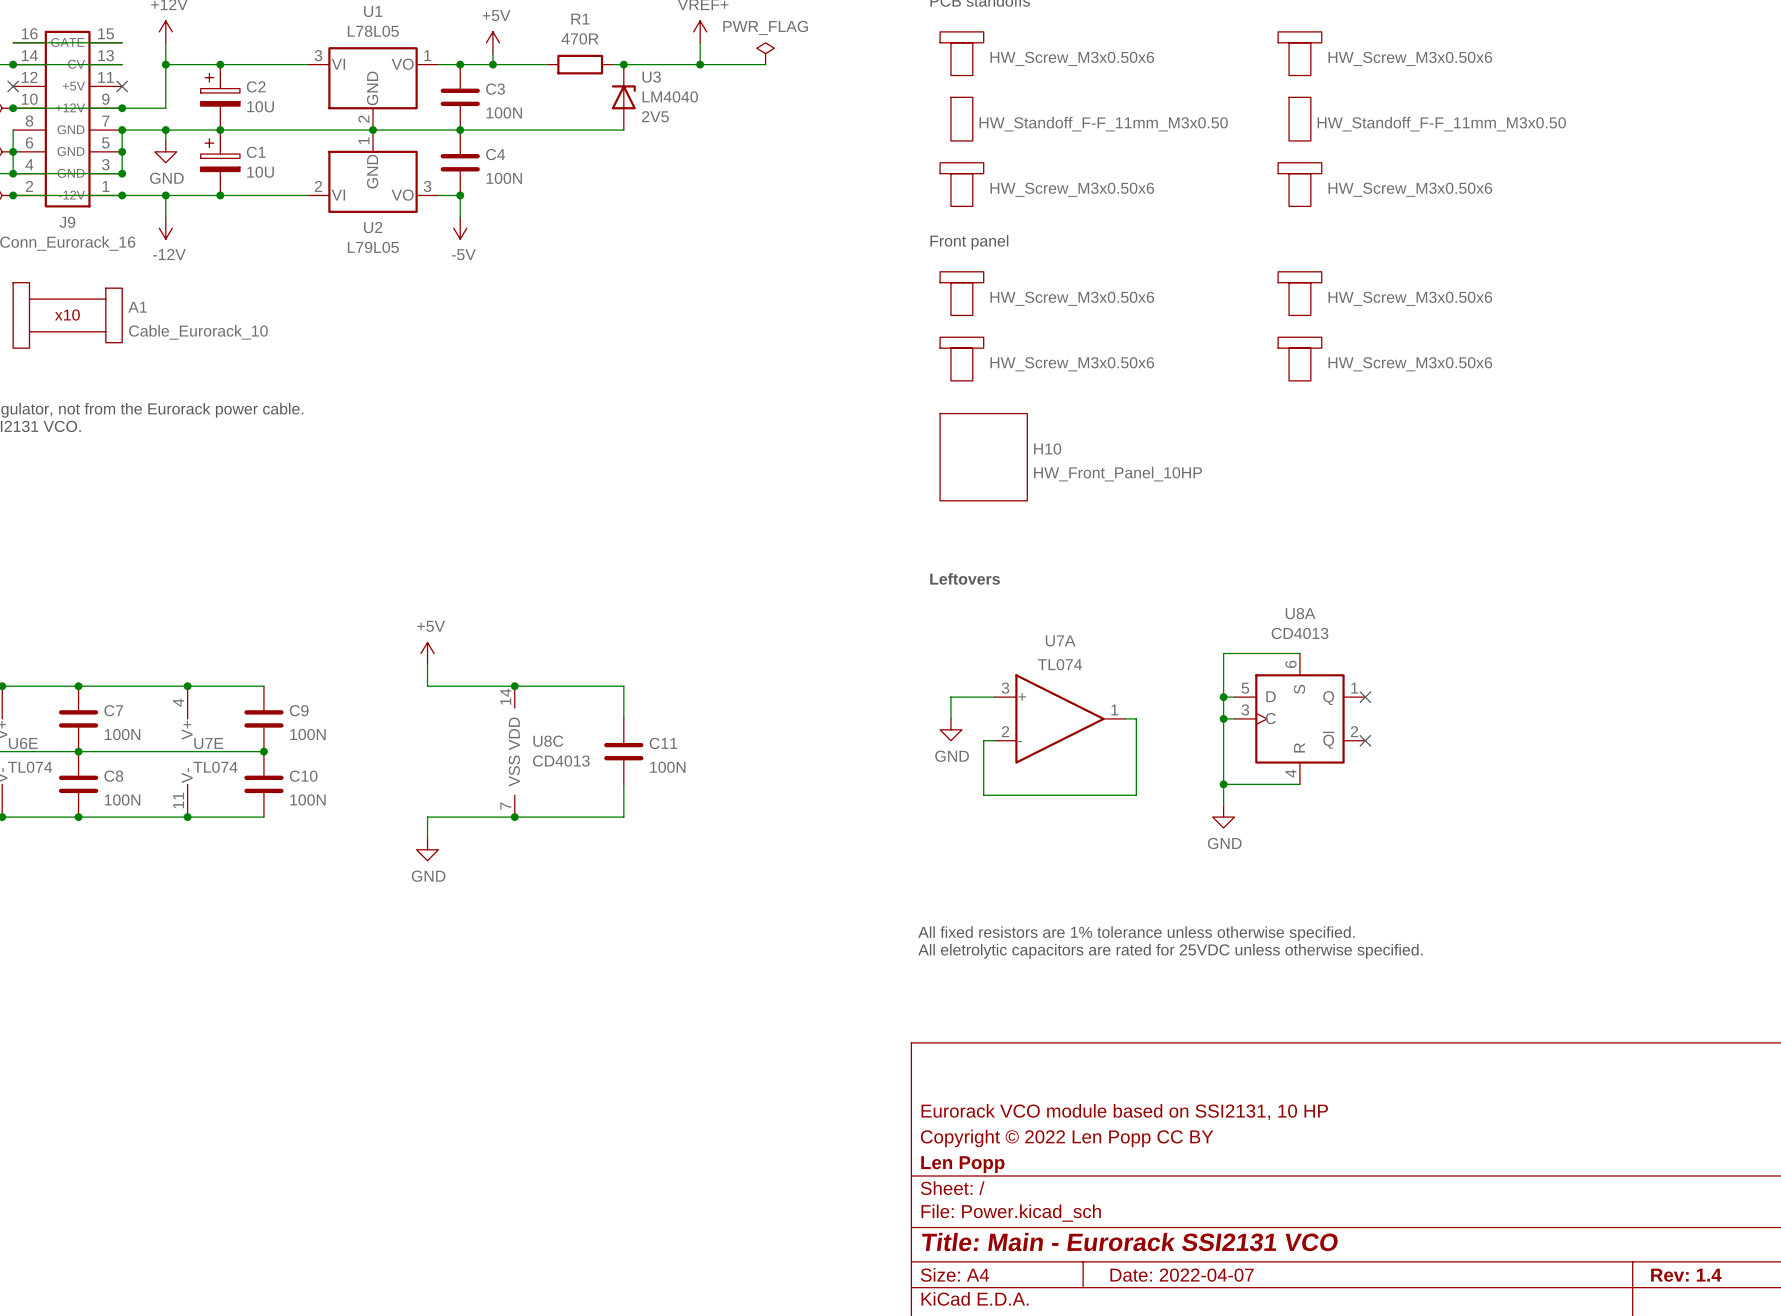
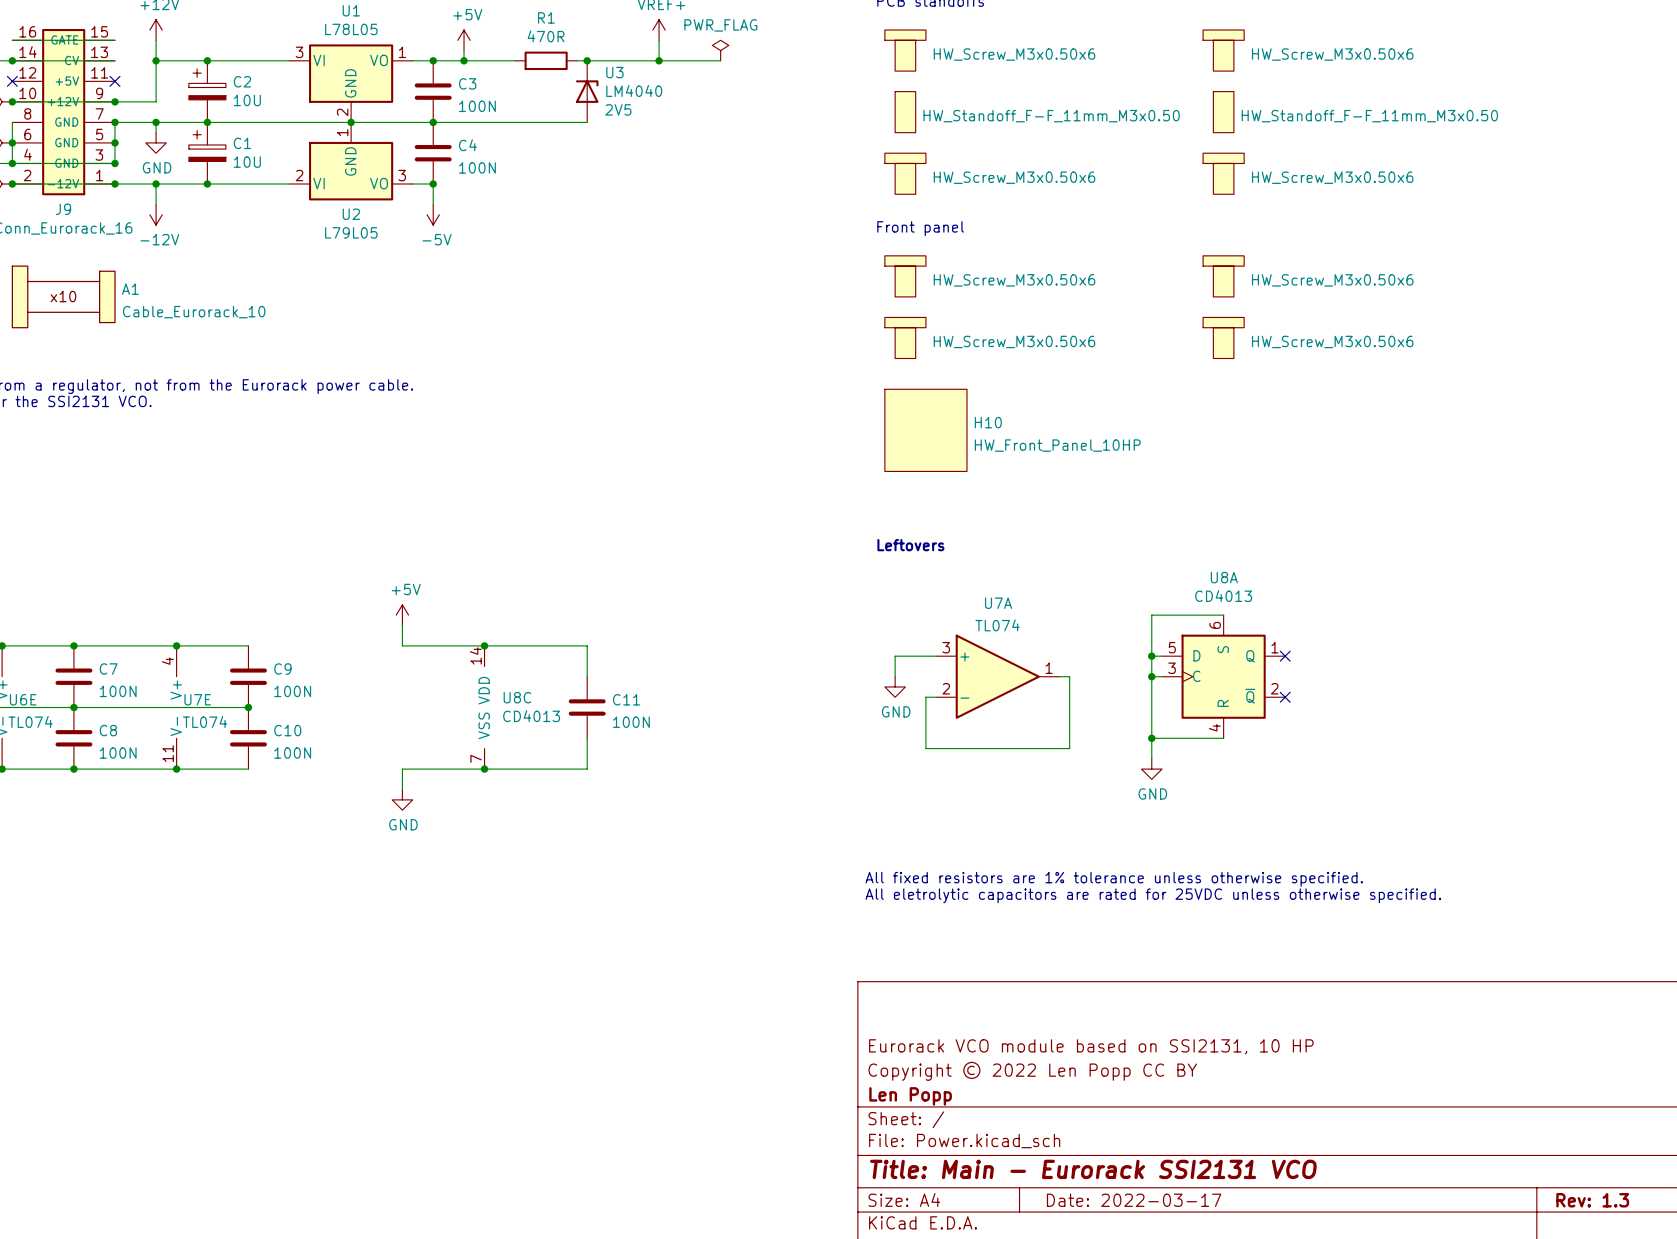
title block: Date: 2022-04-07 (1182, 1275) -> Date: 2022-03-17 (1134, 1200)
title block: Rev: 1.4 (1686, 1275) -> Rev: 1.3 (1592, 1200)

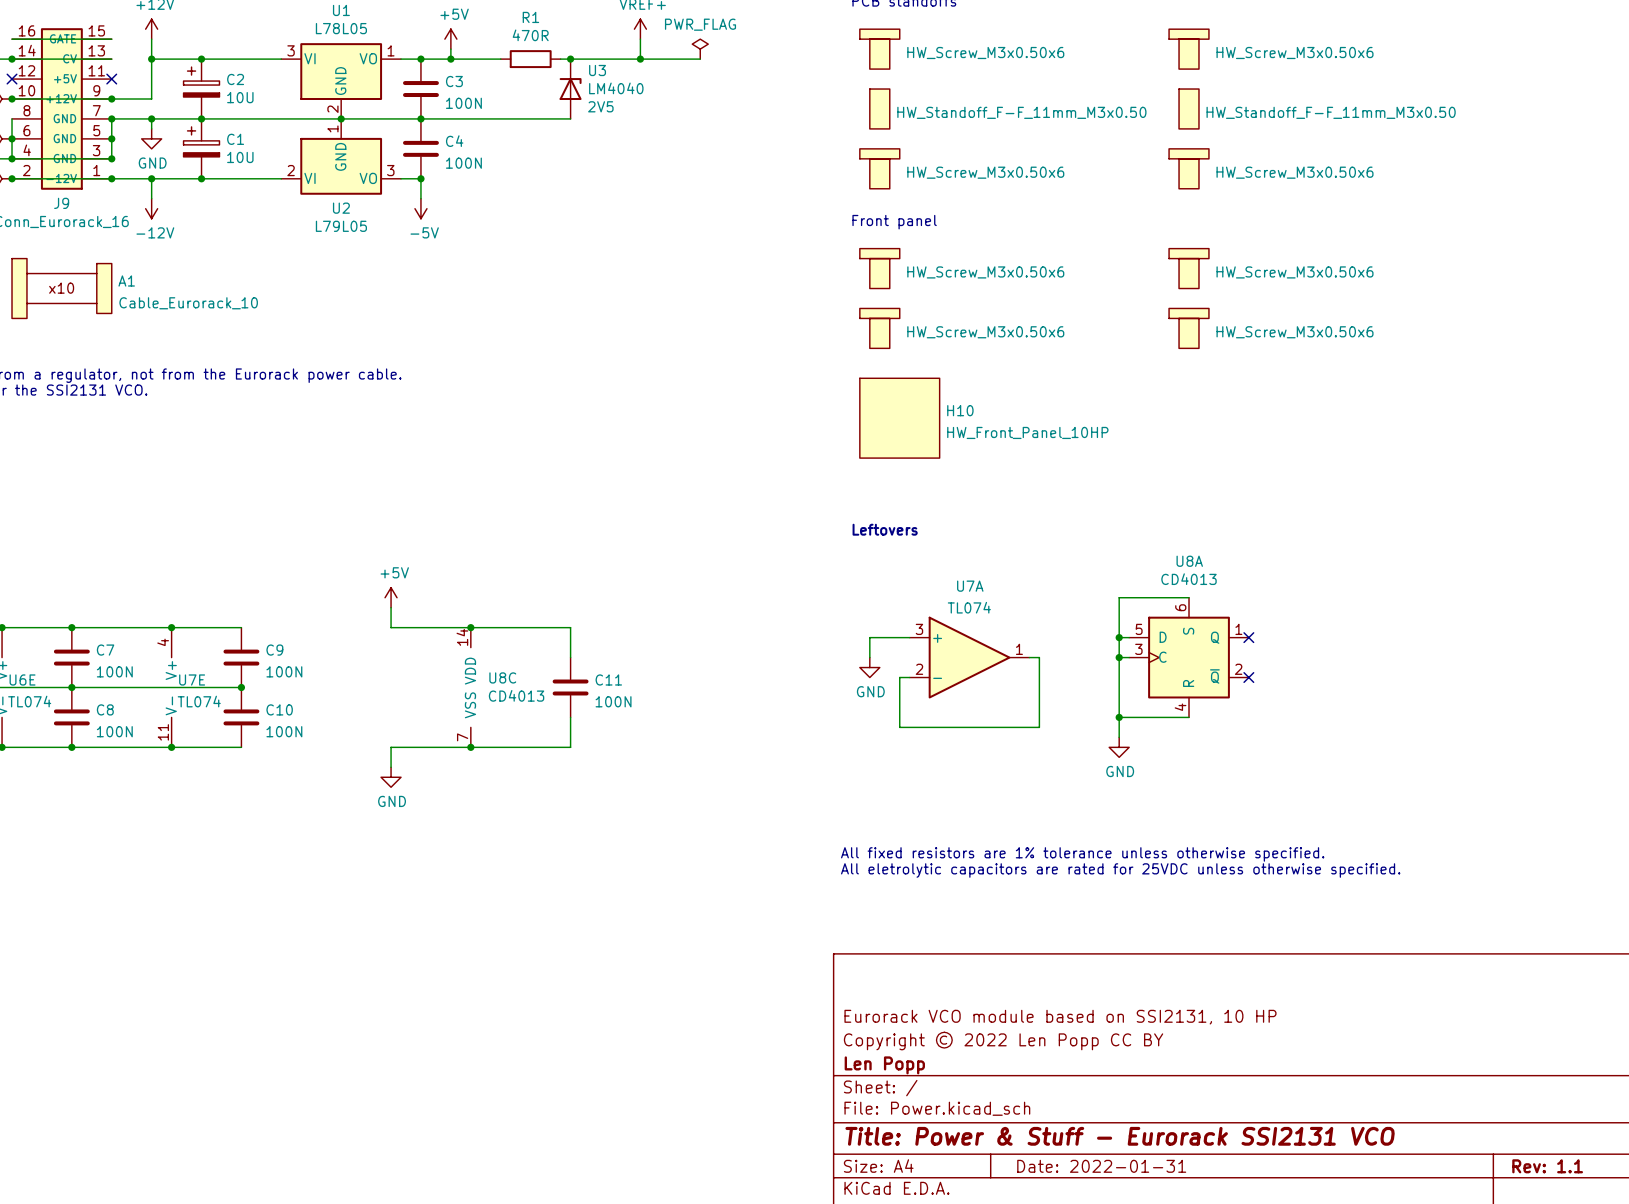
title block: Title: Main - Eurorack SSI2131 VCO (1093, 1169) -> Title: Power & Stuff - Eurorack SSI2131 VCO (1120, 1136)
title block: Date: 2022-03-17 (1134, 1200) -> Date: 2022-01-31 (1101, 1166)
title block: Rev: 1.3 (1592, 1200) -> Rev: 1.1 (1547, 1166)

